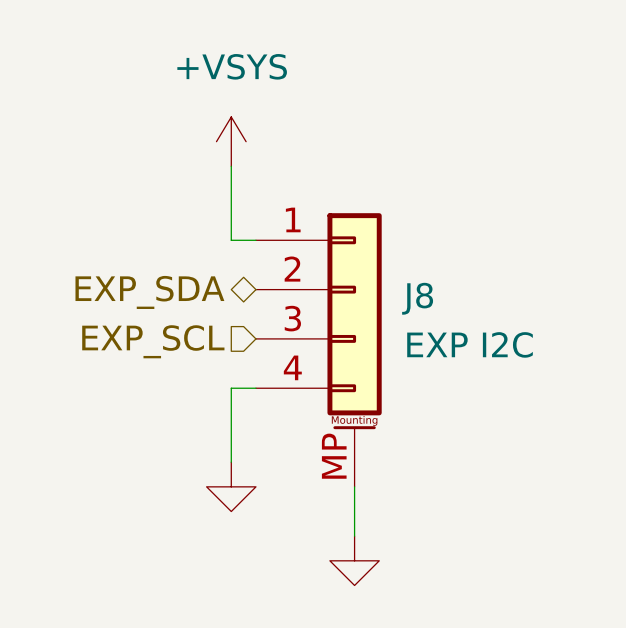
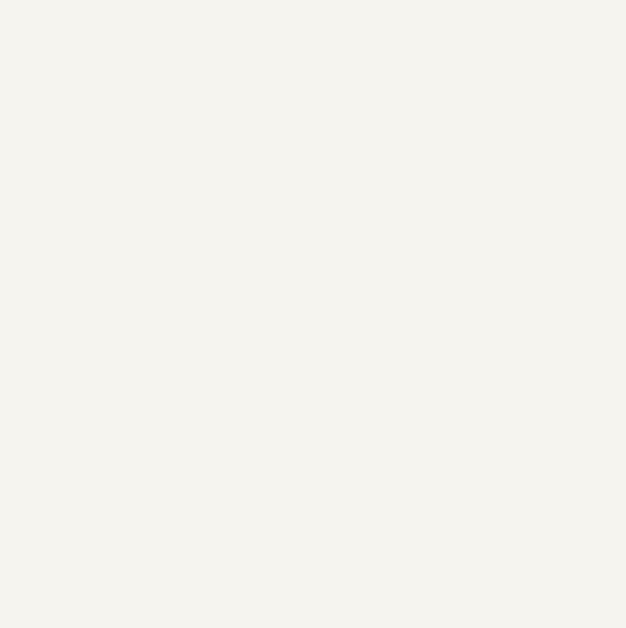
power symbol: +VSYS (231, 141) -> none
wire: (231, 166) (231, 240) (255, 240) -> none
hierarchical label: EXP_SDA (149, 292) -> none
hierarchical label: EXP_SCL (153, 341) -> none
J8: EXP I2C (318, 350) -> none
wire: (255, 388) (231, 388) (231, 462) -> none
power symbol: (231, 486) -> none
wire: (354, 486) (354, 536) -> none
power symbol: (354, 560) -> none

